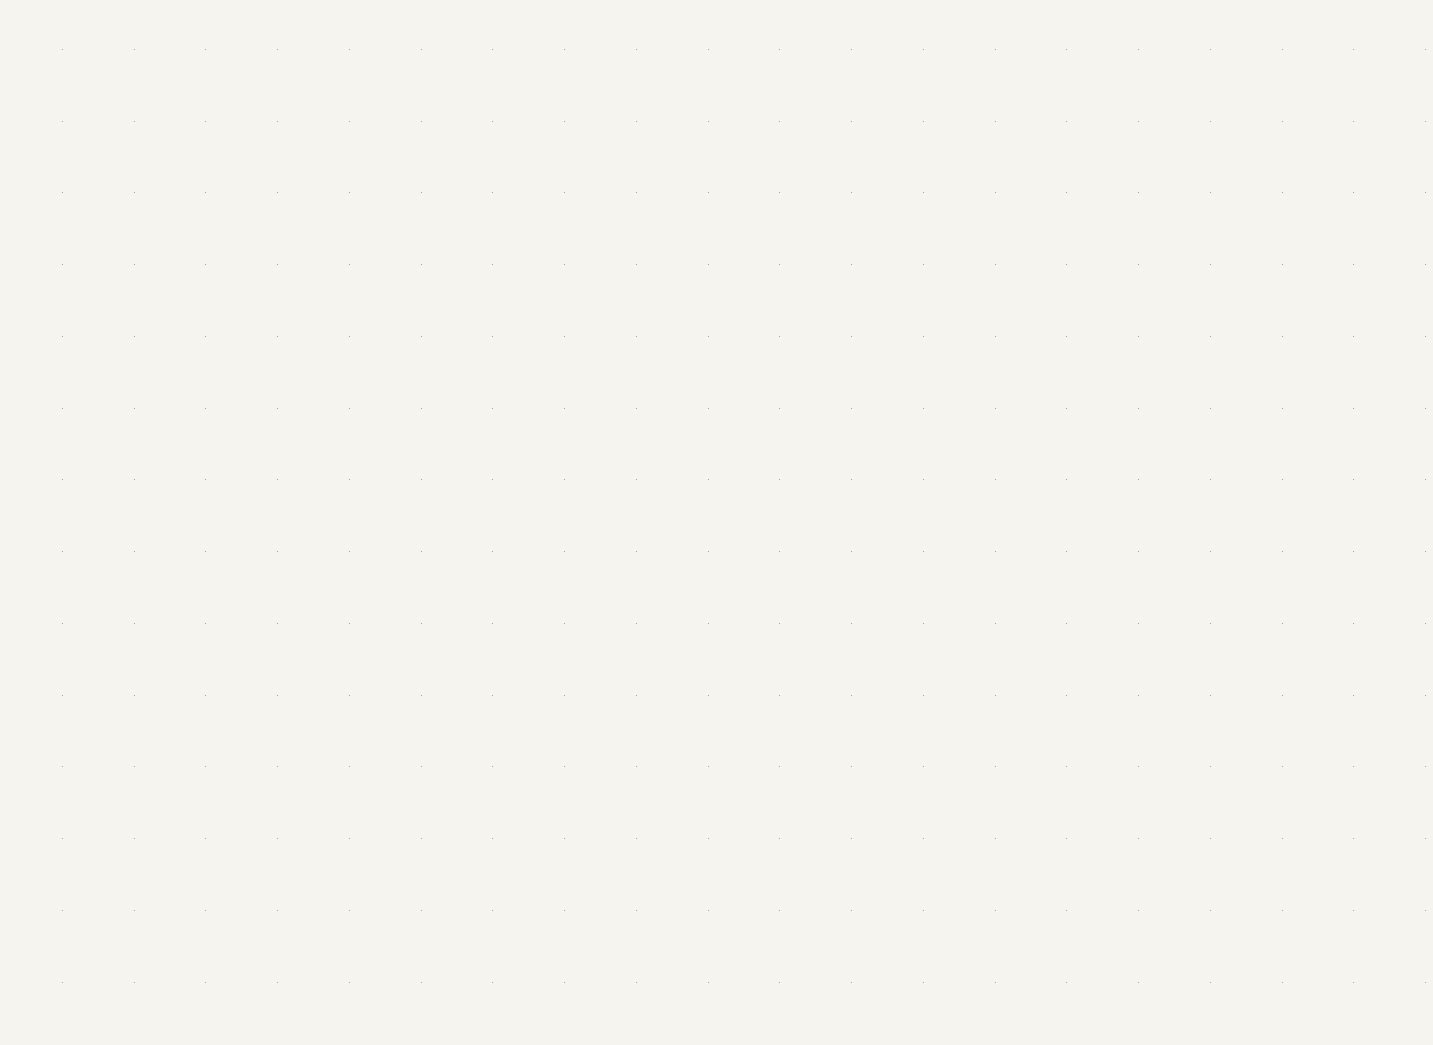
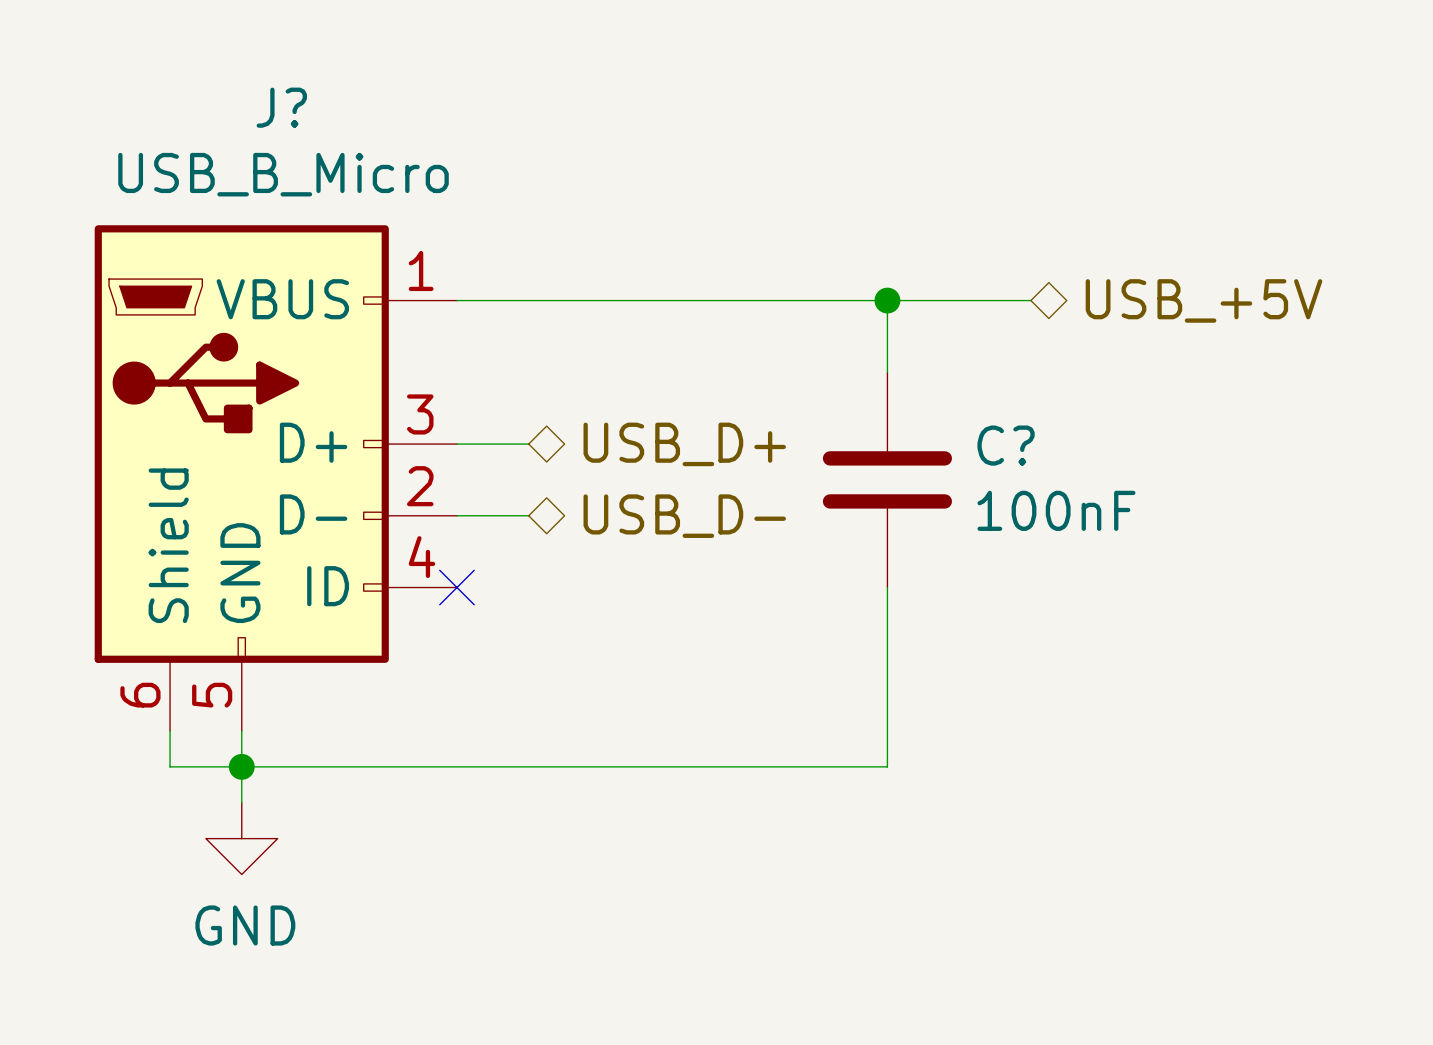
wire: none -> (456, 300) (1030, 300)
wire: none -> (887, 300) (887, 372)
junction: none -> (887, 300)
hierarchical label: none -> USB_+5V (1203, 300)
wire: none -> (456, 444) (528, 444)
hierarchical label: none -> USB_D+ (684, 444)
J?: none -> USB_B_Micro (275, 478)
C?: none -> 100nF (887, 479)
wire: none -> (456, 515) (528, 515)
hierarchical label: none -> USB_D- (684, 516)
no-connect mark: none -> (456, 587)
wire: none -> (887, 587) (887, 766) (170, 766) (170, 731)
wire: none -> (241, 731) (241, 802)
junction: none -> (241, 766)
power symbol: none -> GND (241, 838)

